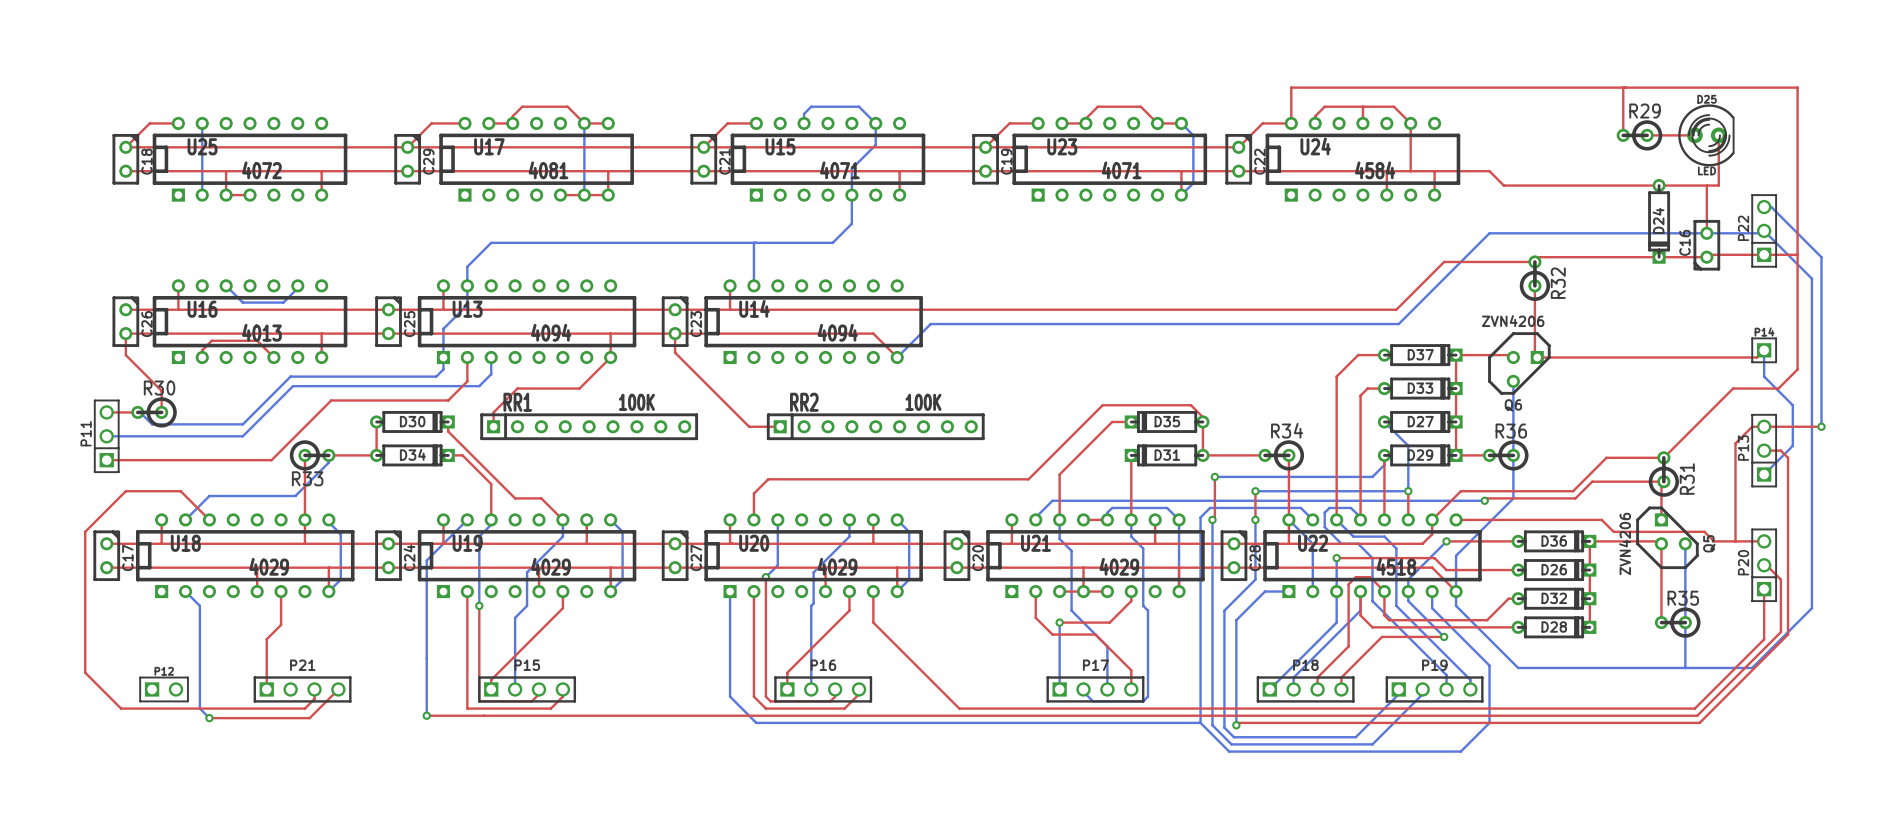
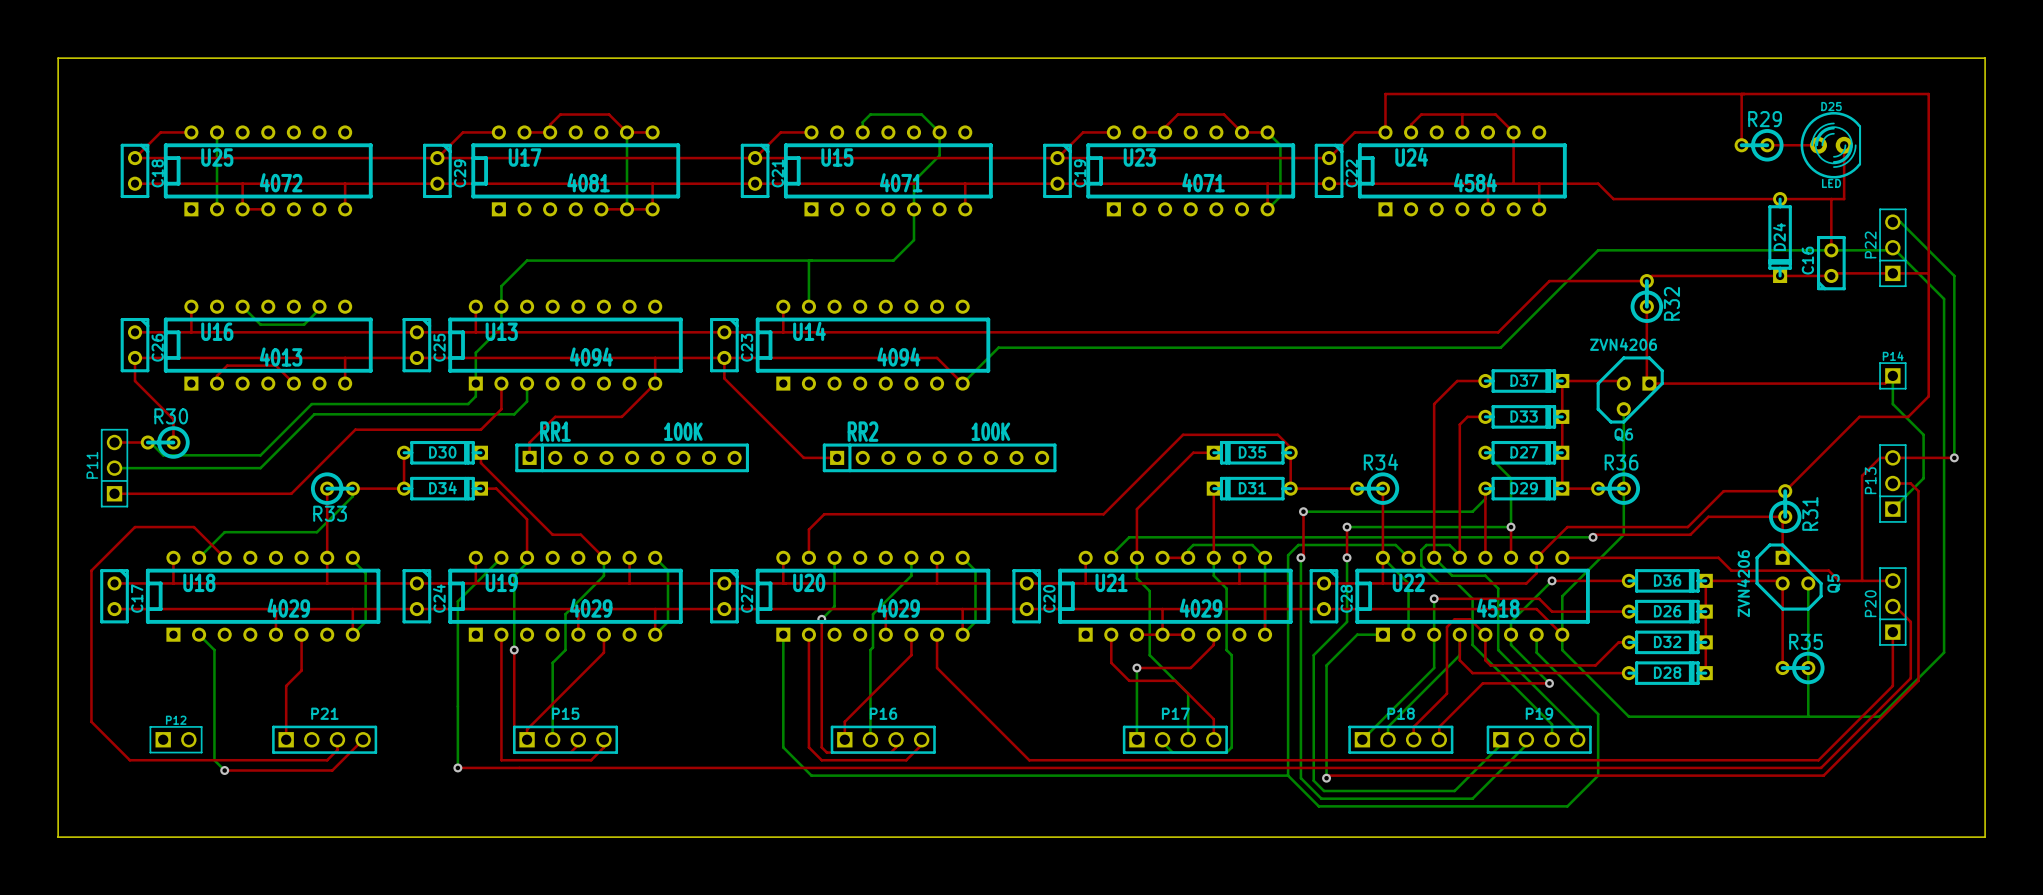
board edge: none -> (58, 58) (58, 837) (1985, 837) (1985, 58) (58, 58)

